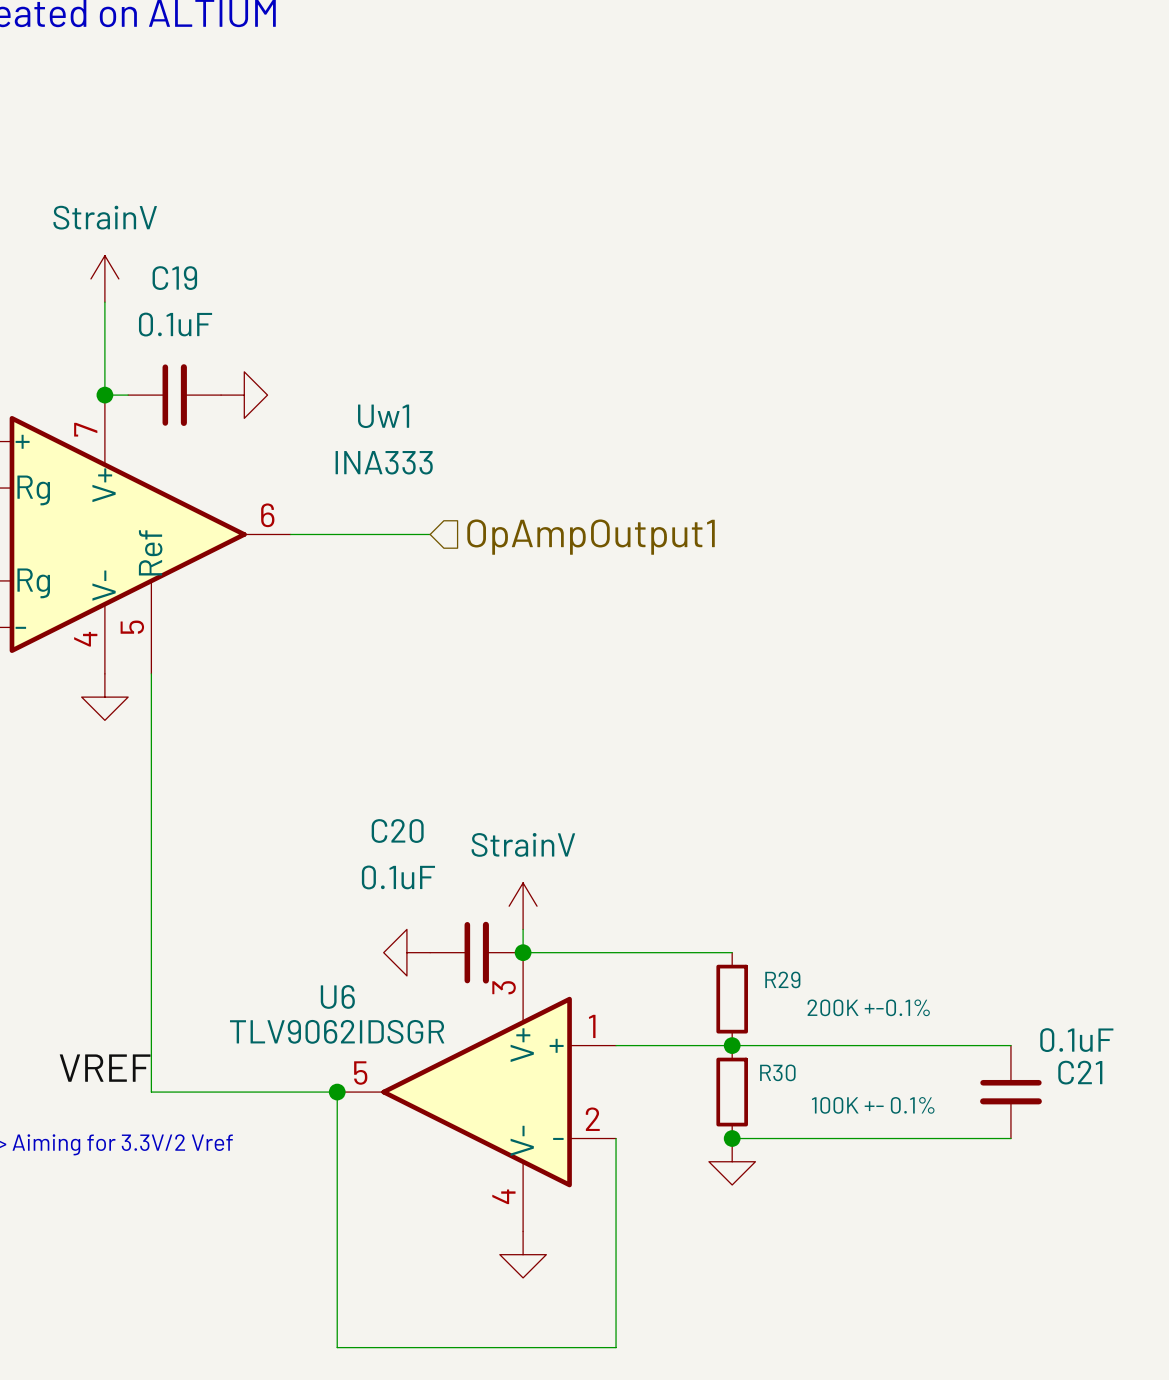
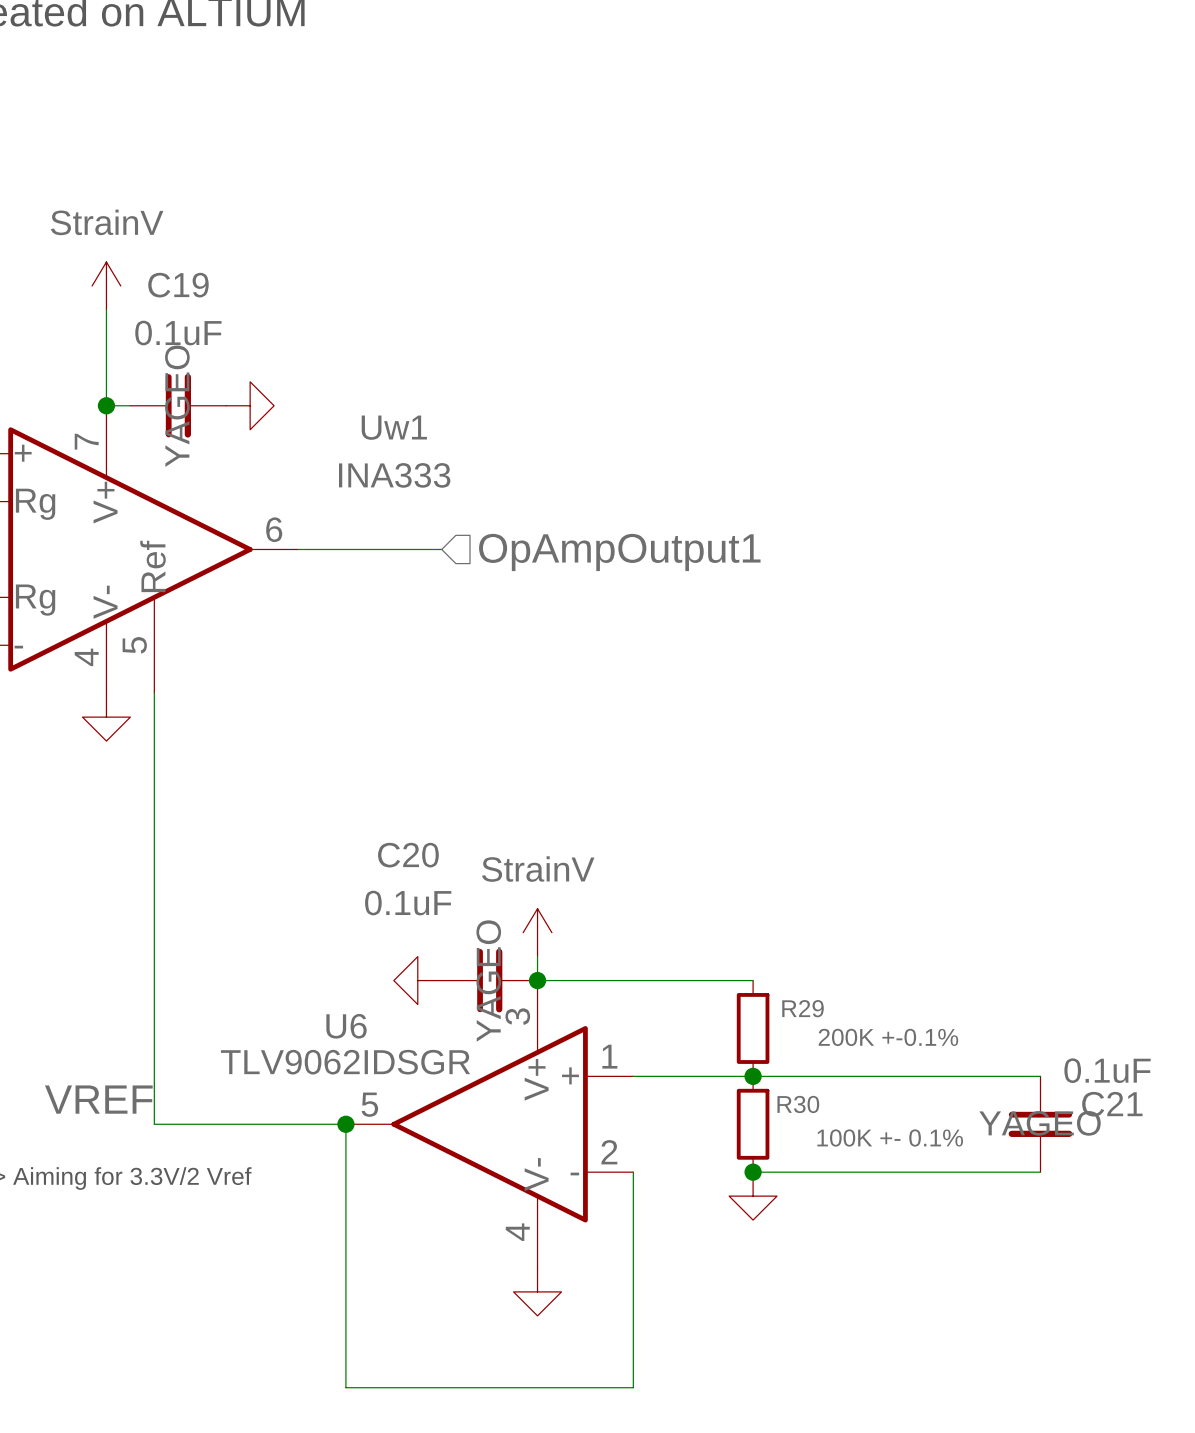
C19 text: none -> YAGEO (177, 406)
C20 text: none -> YAGEO (488, 981)
C21 text: none -> YAGEO (1040, 1123)

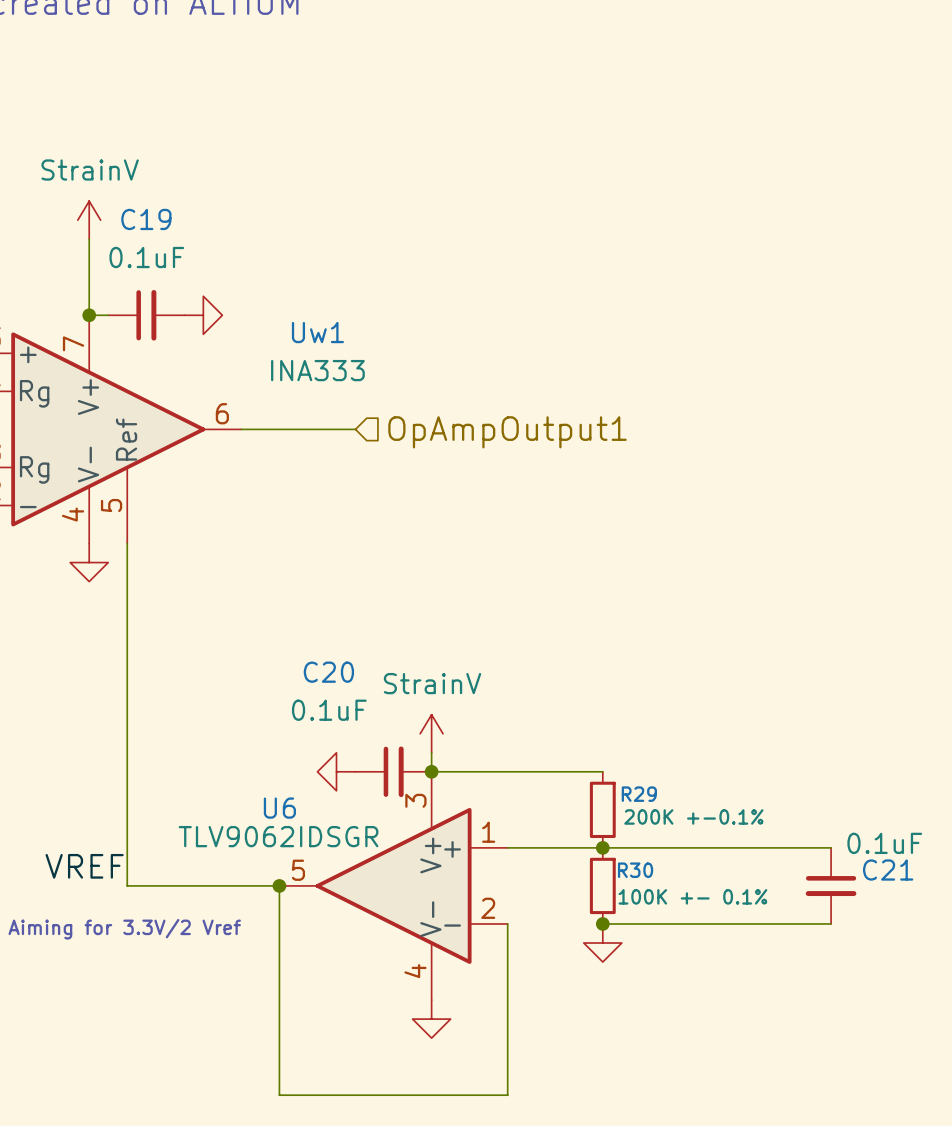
C19 text: YAGEO (177, 406) -> none
C20 text: YAGEO (488, 981) -> none
C21 text: YAGEO (1040, 1123) -> none

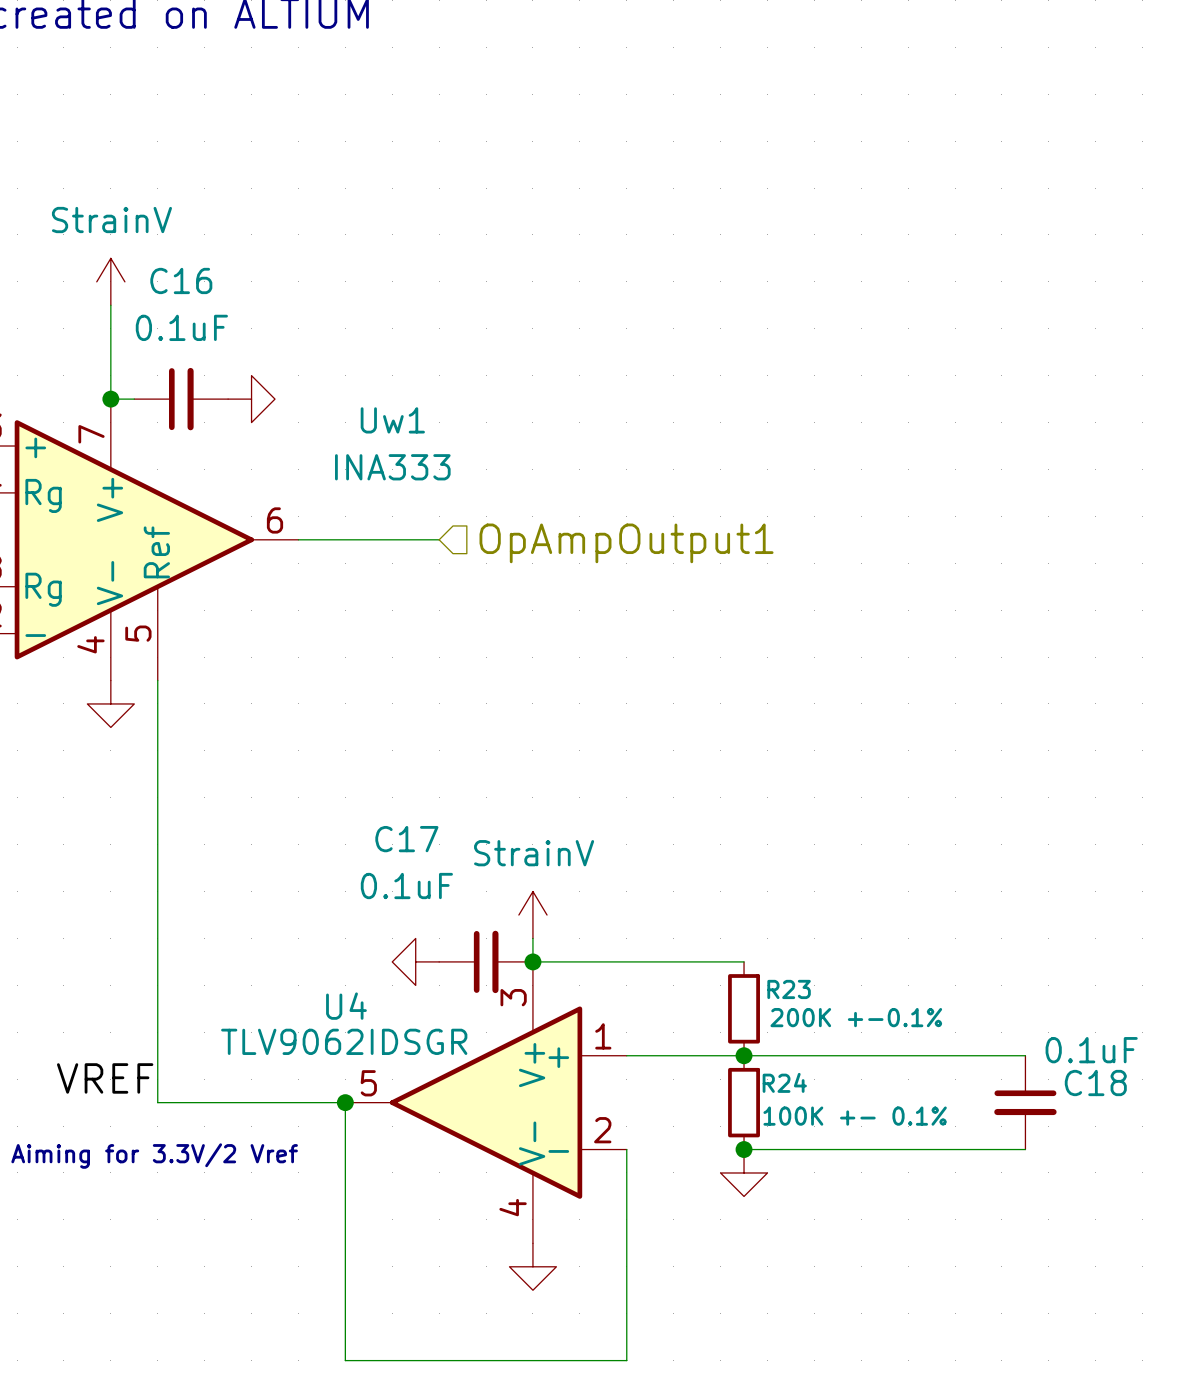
C19 name: C19 (146, 219) -> C16 (181, 280)
C20 name: C20 (328, 672) -> C17 (406, 839)
R29 name: R29 (639, 794) -> R23 (789, 989)
U6 name: U6 (279, 808) -> U4 (346, 1006)
R30 name: R30 (635, 870) -> R24 (784, 1082)
C21 name: C21 (888, 870) -> C18 (1095, 1083)

